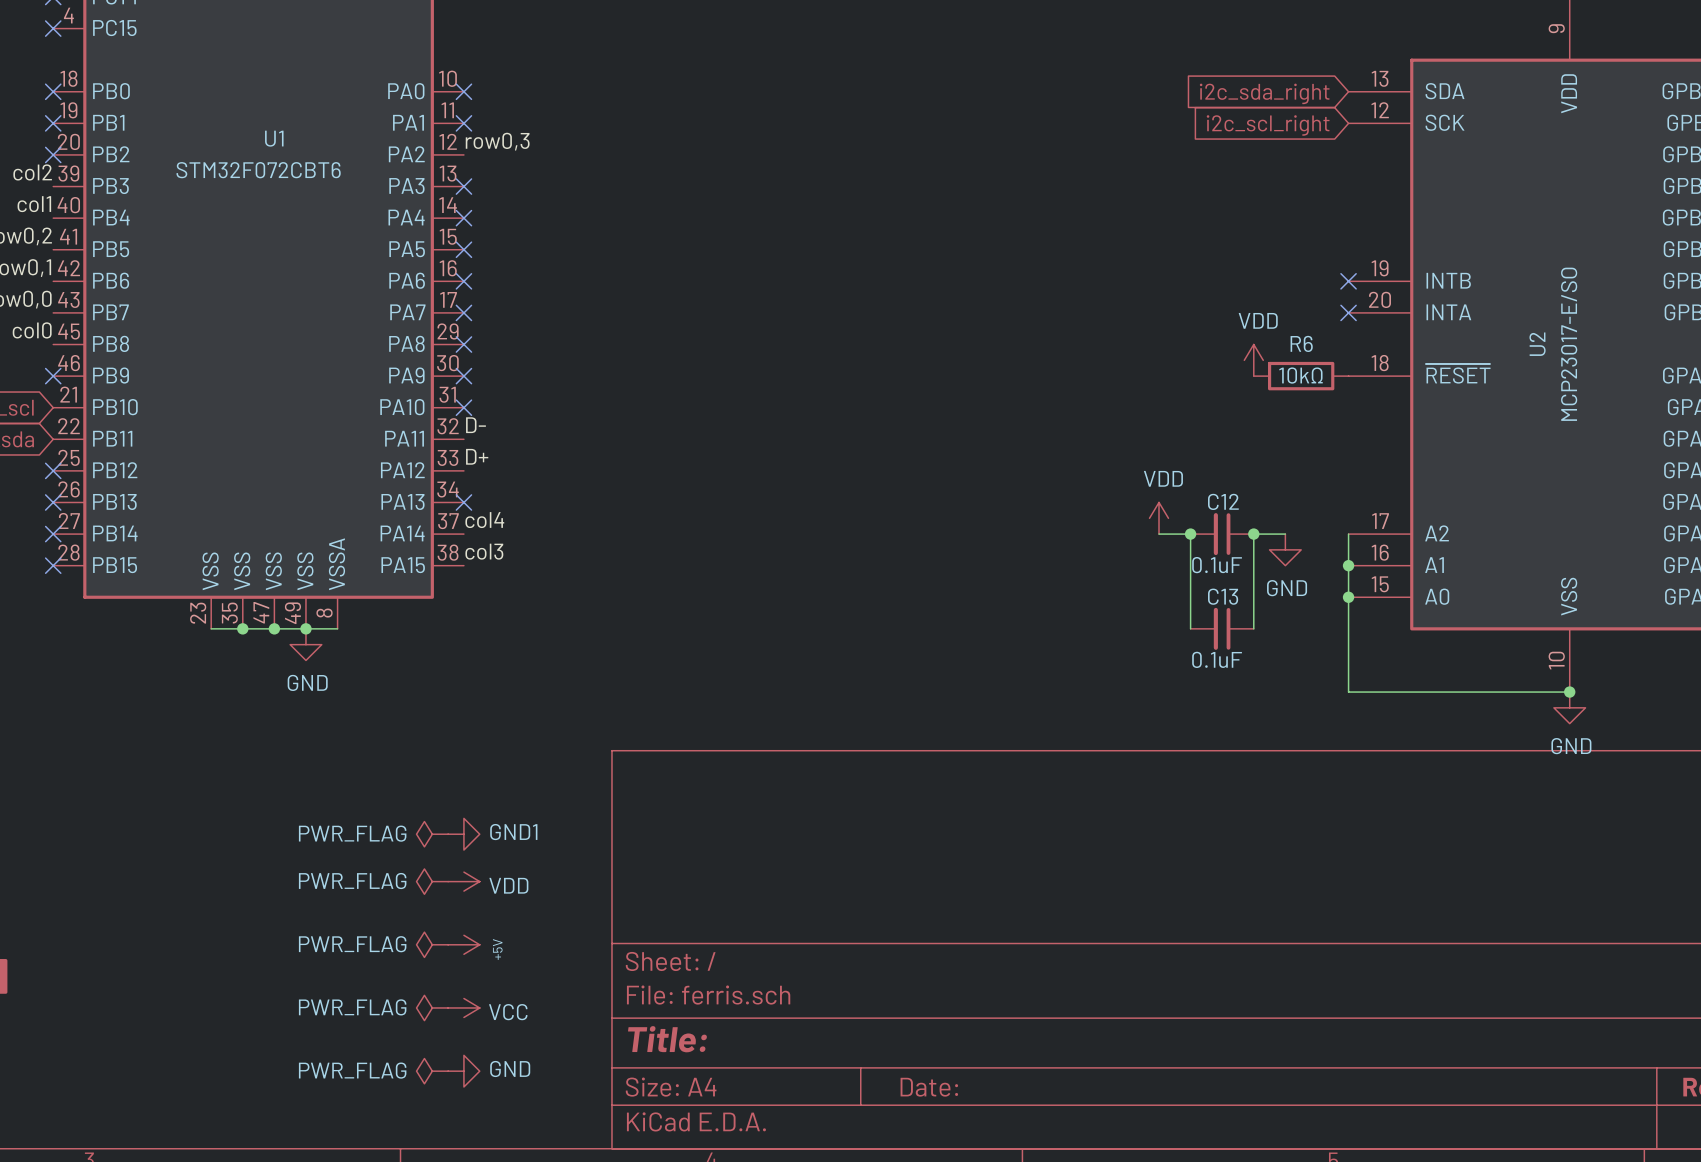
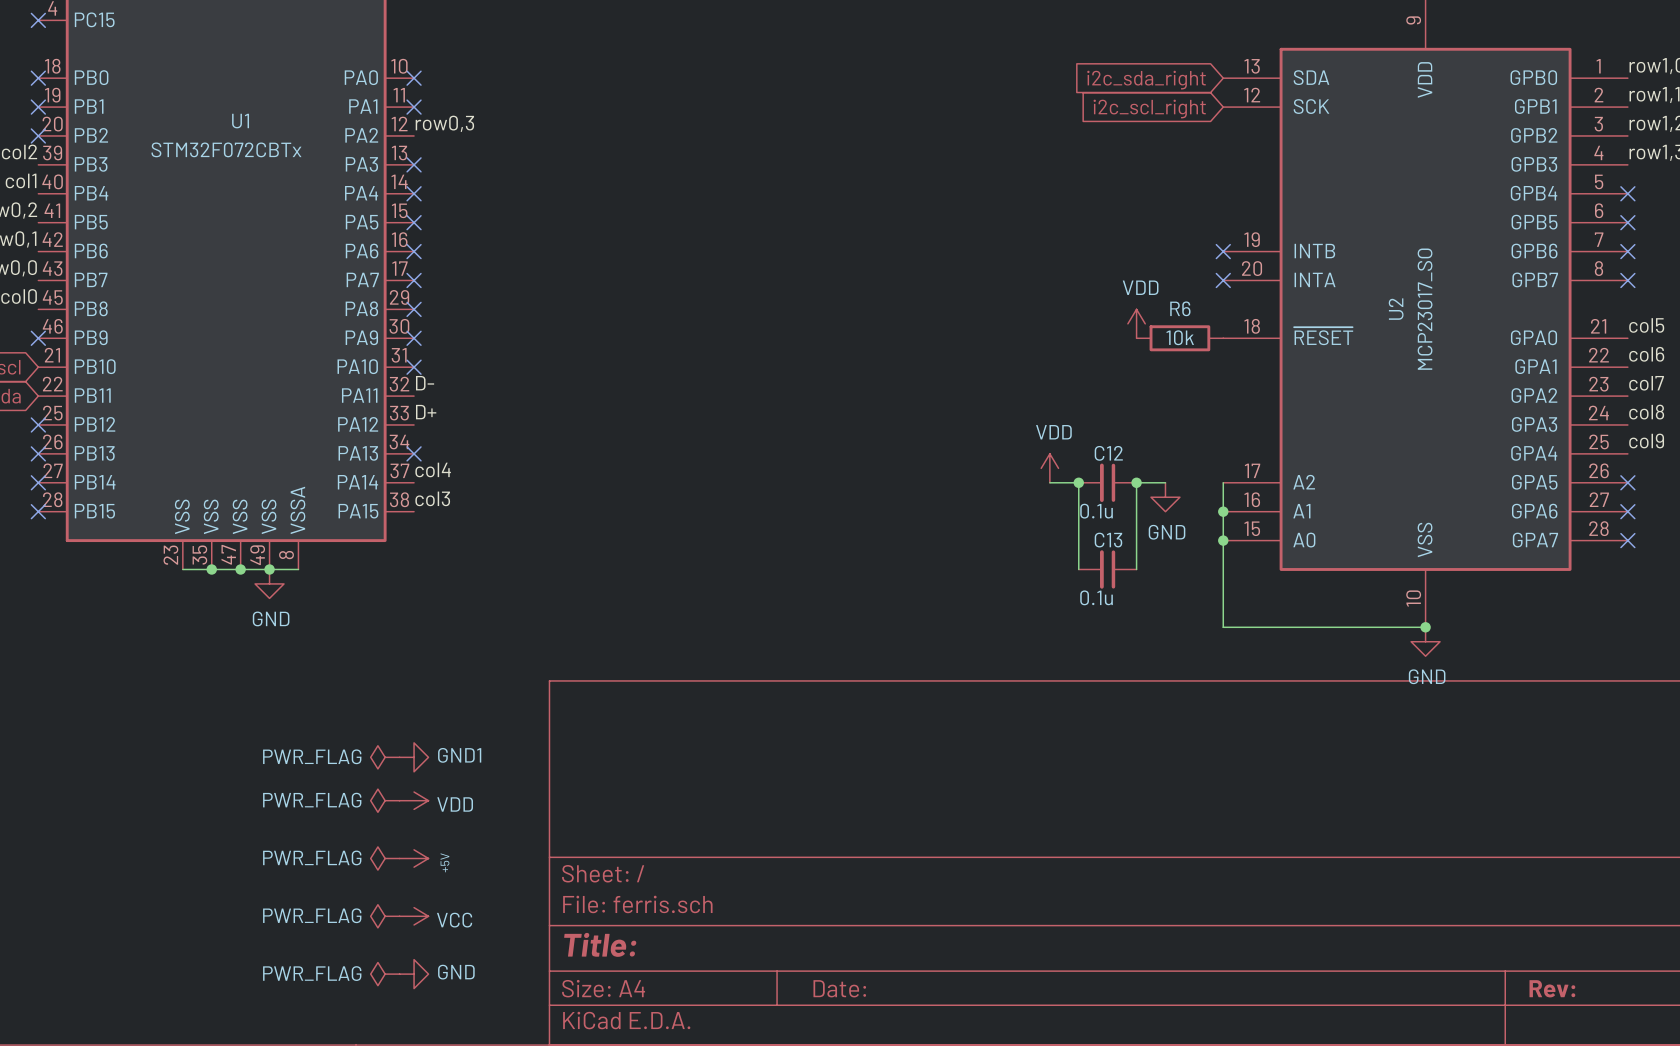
U1 value: STM32F072CBT6 (258, 170) -> STM32F072CBTx (226, 149)
U2 value: MCP23017-E/SO (1569, 344) -> MCP23017_SO (1425, 309)
R6 value: 10kΩ (1301, 375) -> 10k (1180, 337)
C12 value: 0.1uF (1217, 565) -> 0.1u (1096, 511)
C13 value: 0.1uF (1217, 659) -> 0.1u (1096, 597)

